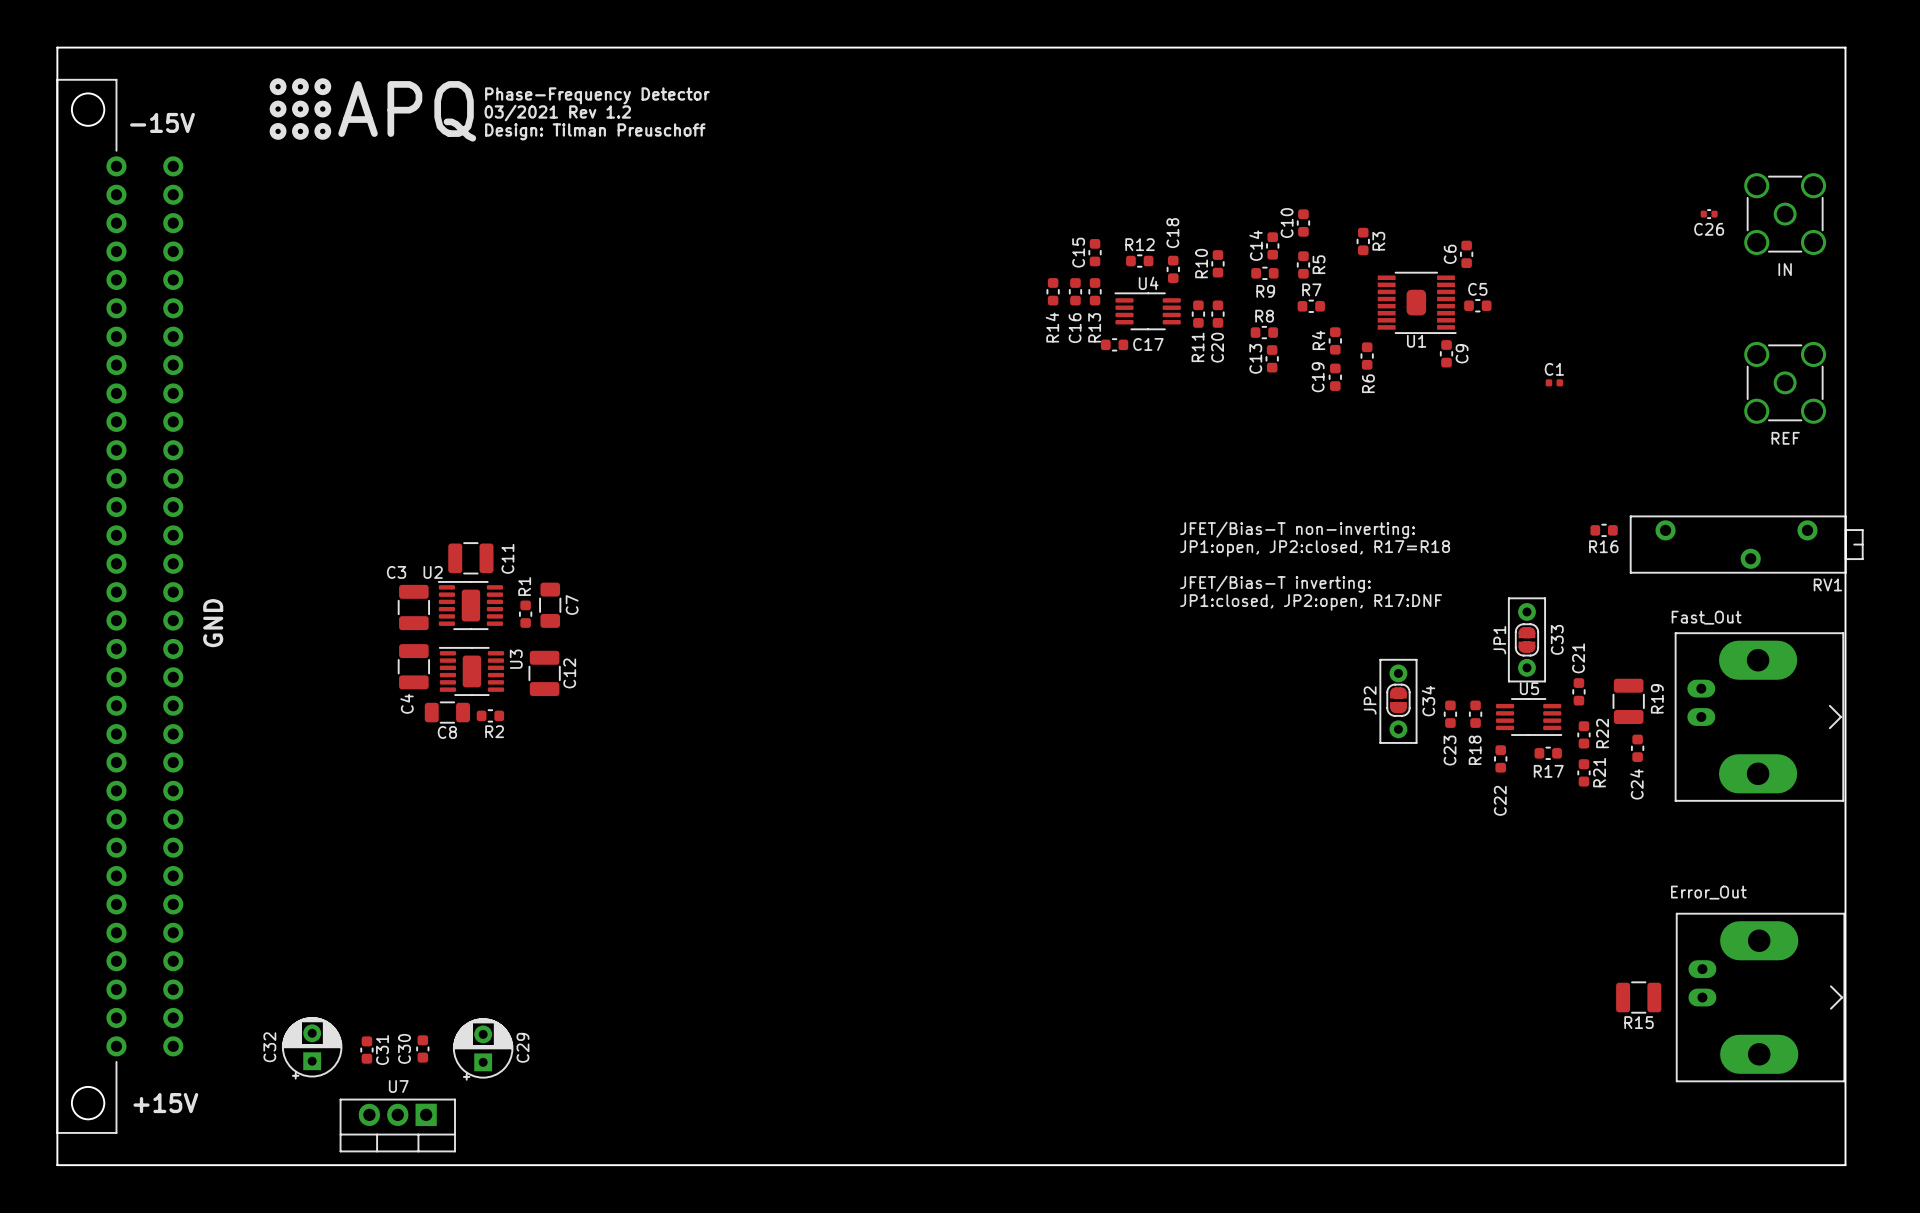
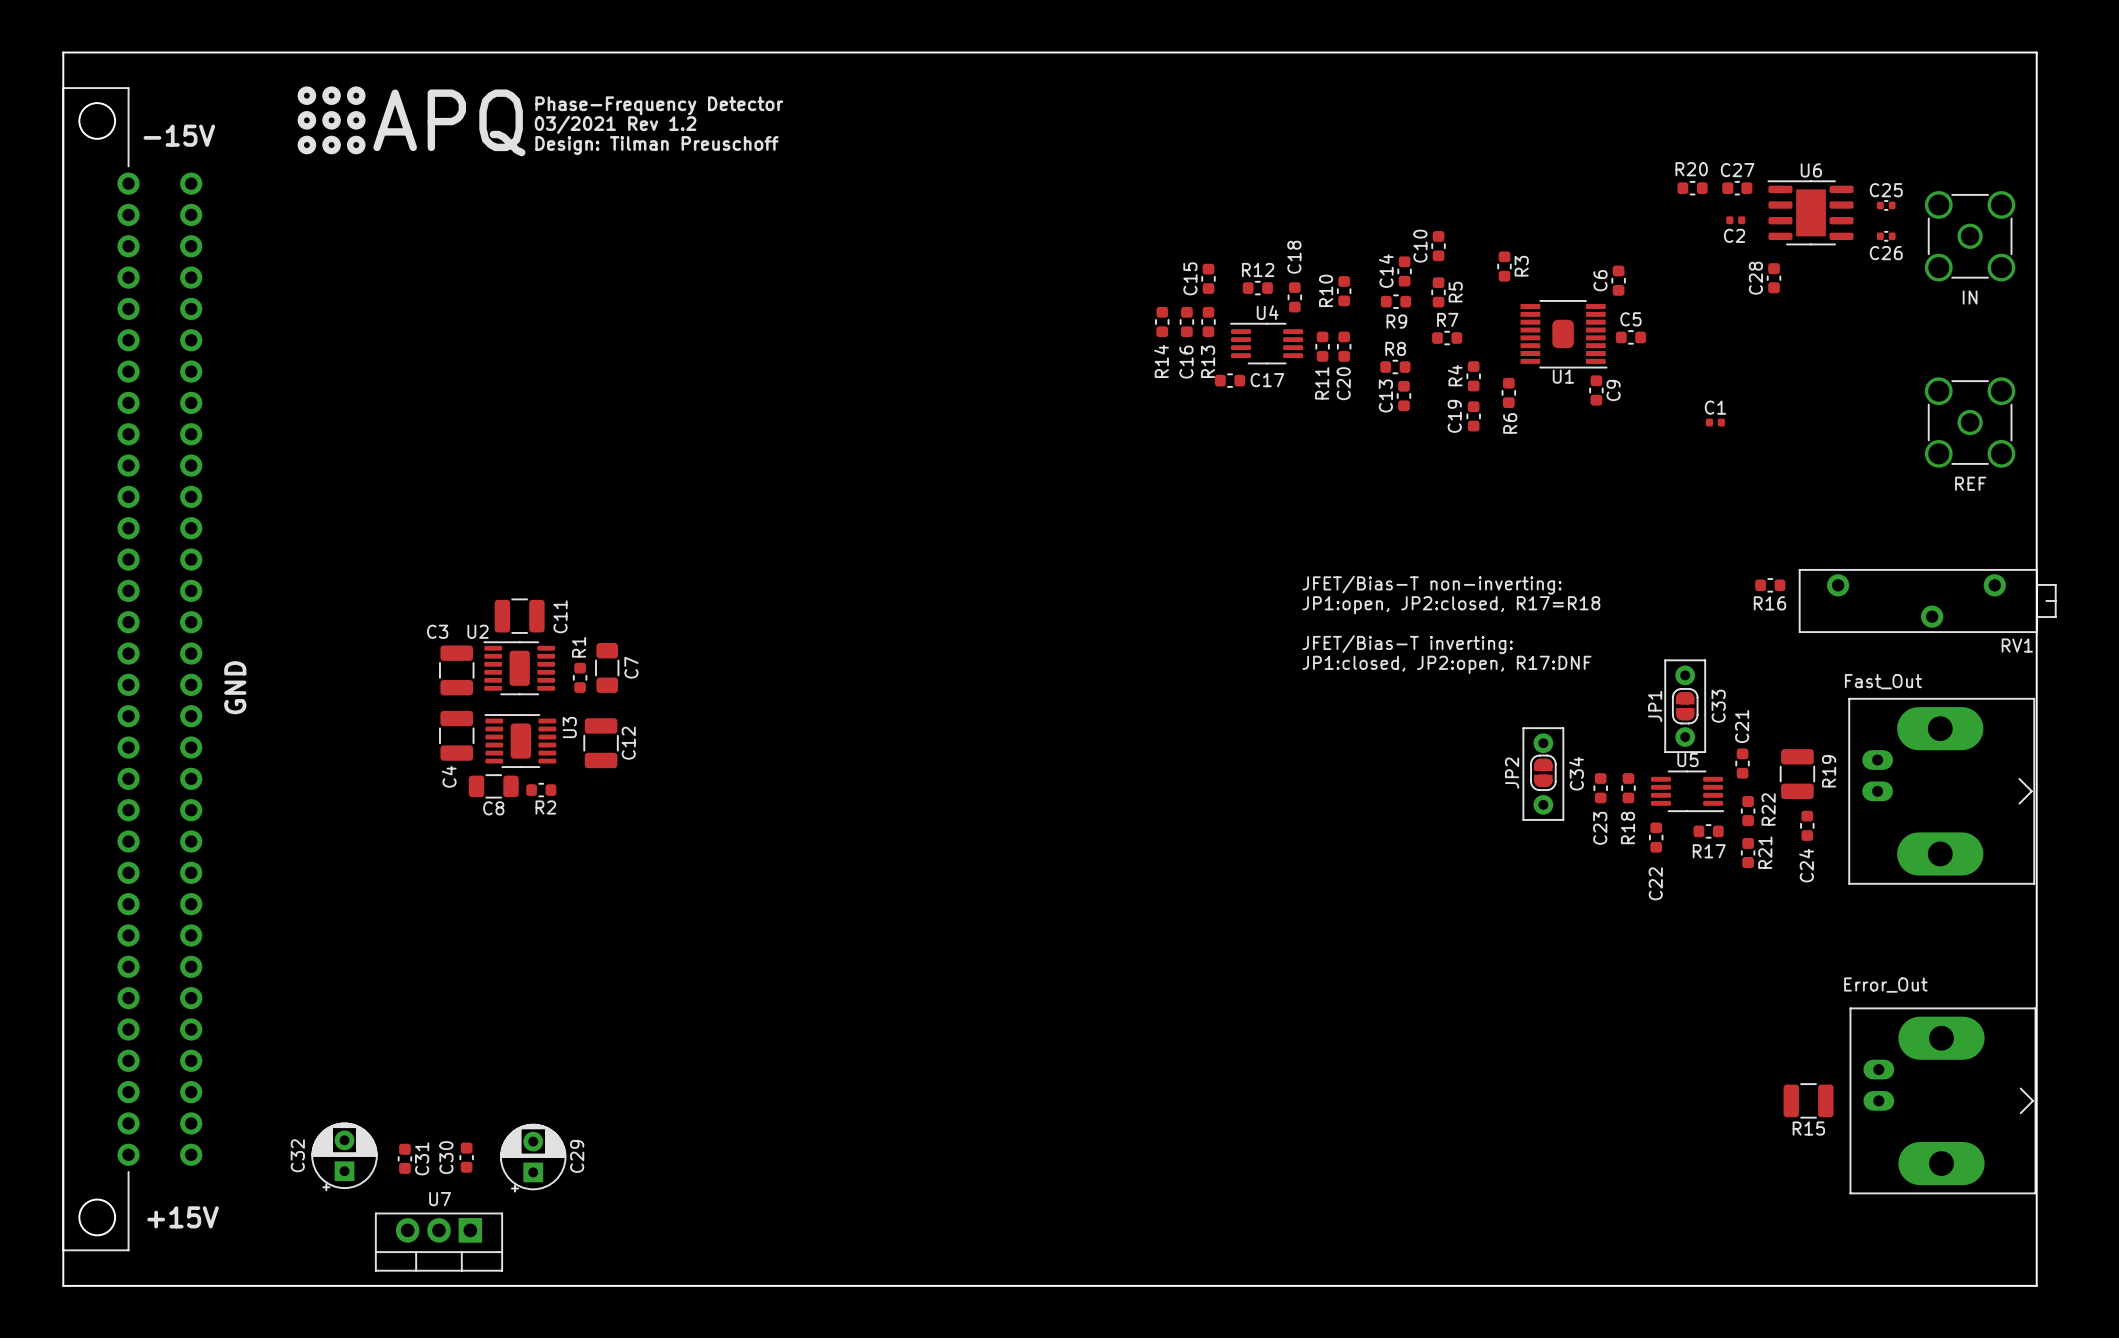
R20: none -> (1692, 188)
C27: none -> (1737, 188)
C25: none -> (1886, 205)
U6: none -> (1810, 212)
C2: none -> (1735, 220)
C28: none -> (1774, 278)

